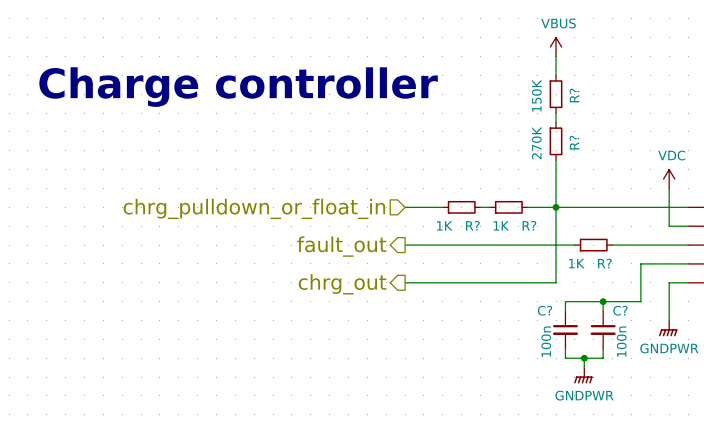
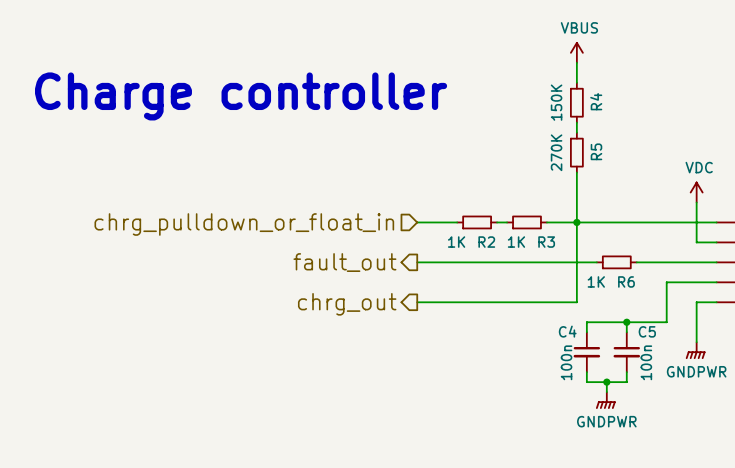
R? name: R? (574, 95) -> R4 (596, 101)
R? name: R? (574, 142) -> R5 (596, 151)
R? name: R? (472, 225) -> R2 (486, 242)
R? name: R? (529, 225) -> R3 (546, 242)
R? name: R? (604, 263) -> R6 (626, 281)
C? name: C? (545, 310) -> C4 (567, 331)
C? name: C? (620, 310) -> C5 (647, 331)

